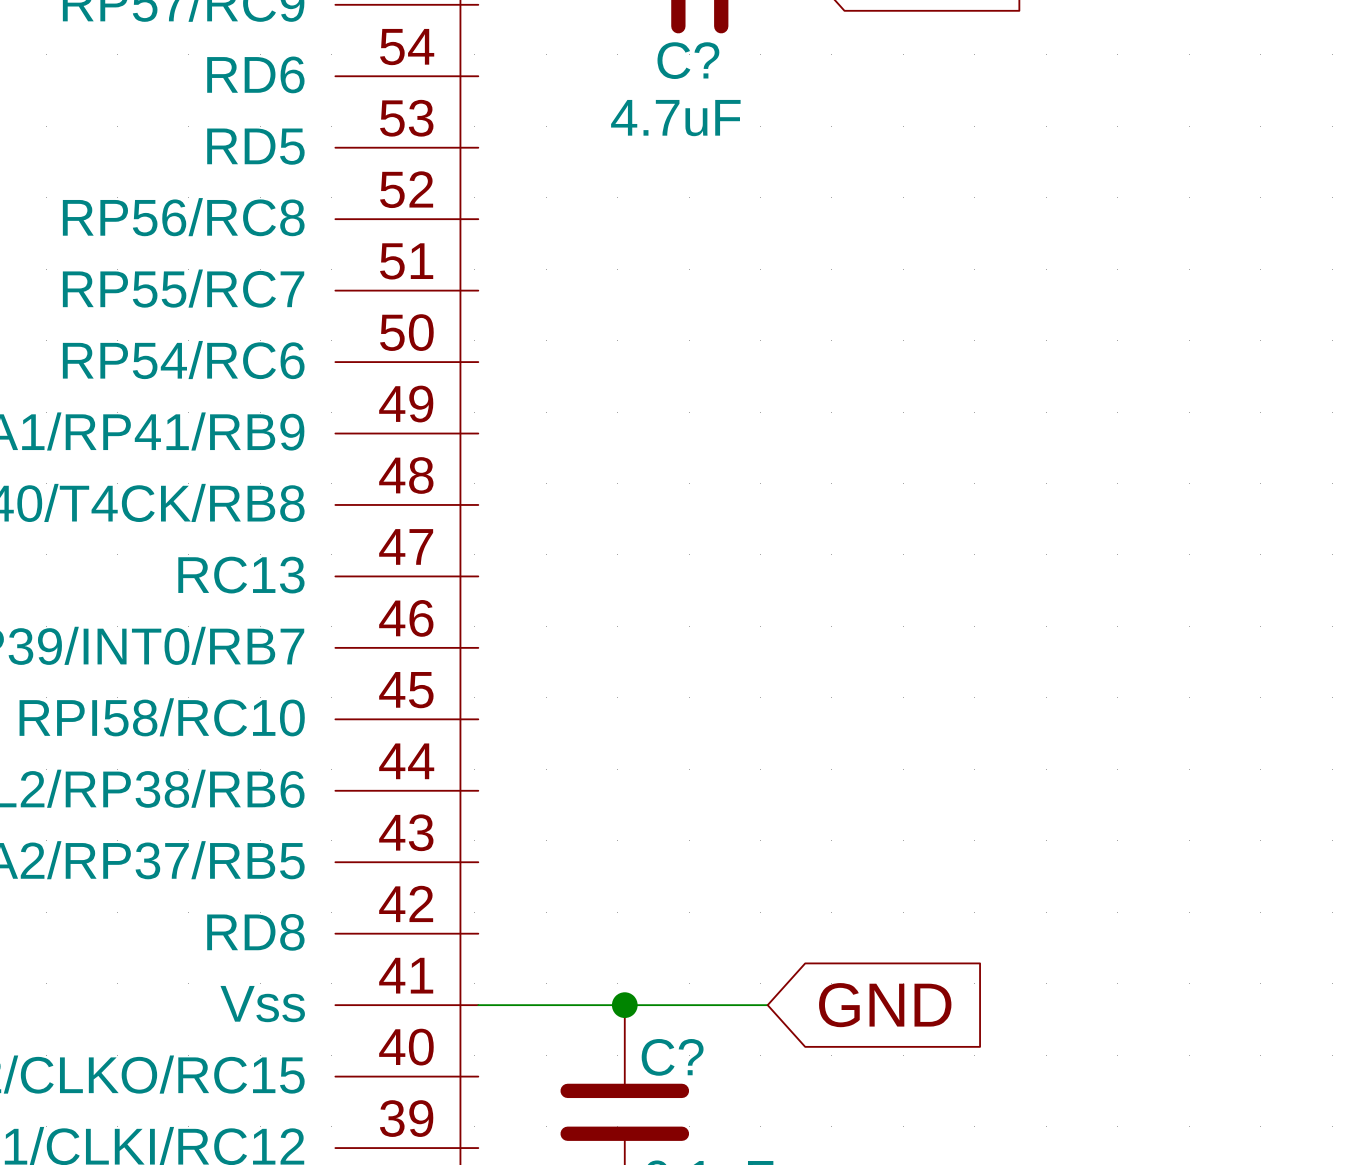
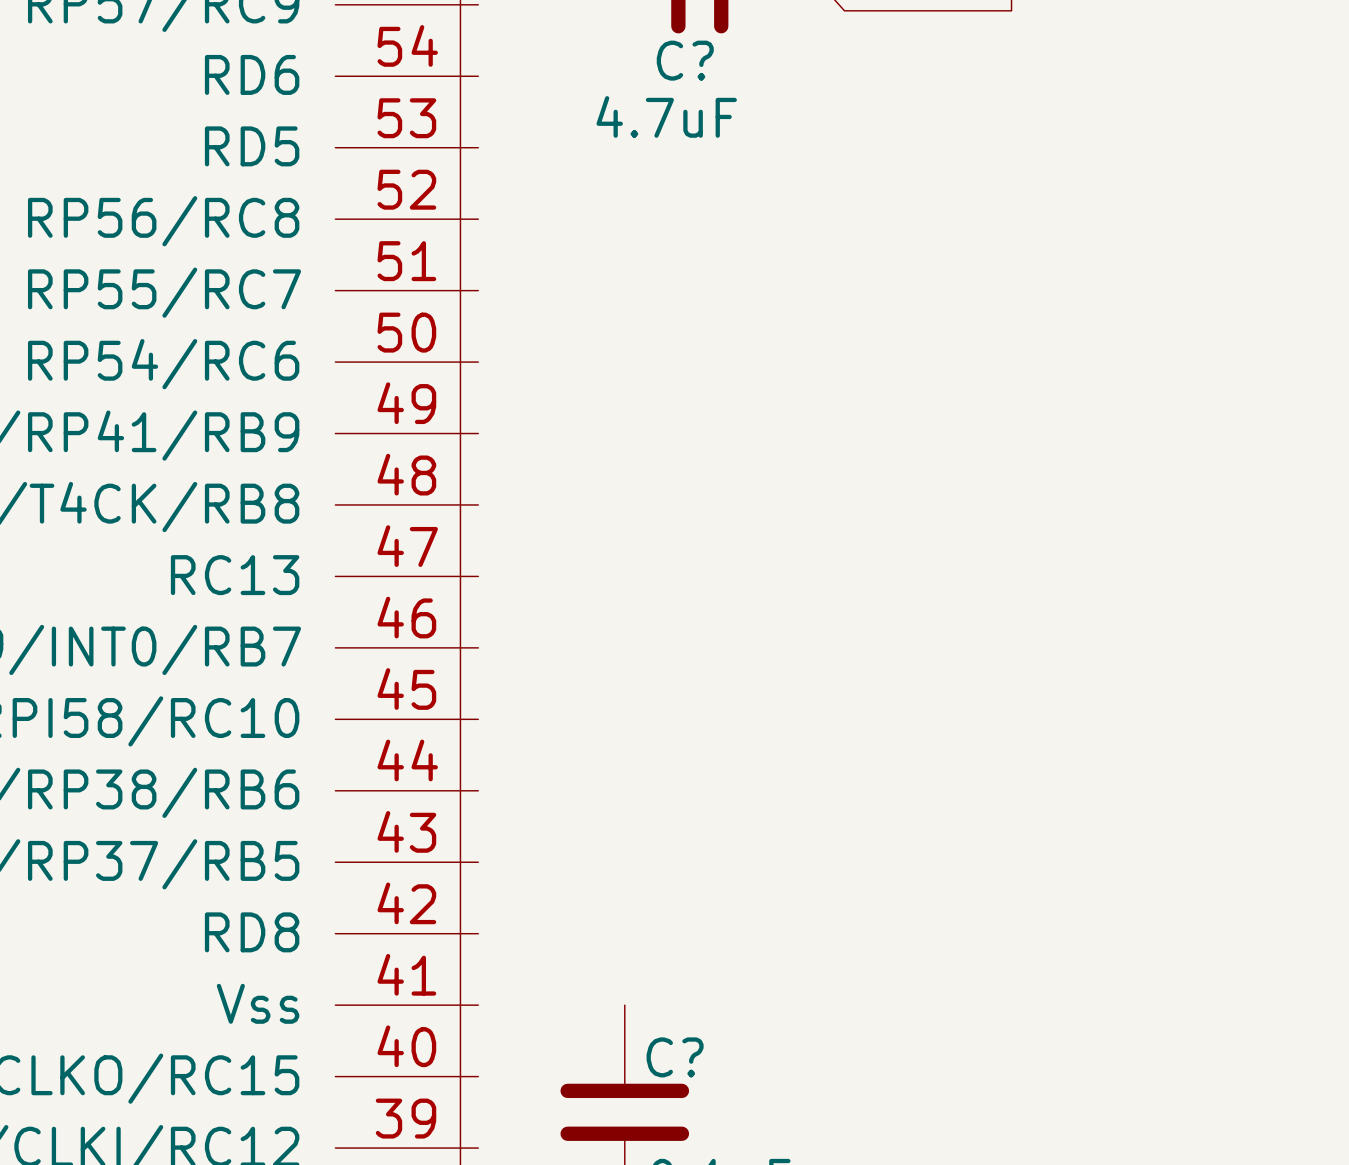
wire: (478, 1005) (767, 1005) -> none
junction: (624, 1005) -> none
global label: GND (885, 1005) -> none

